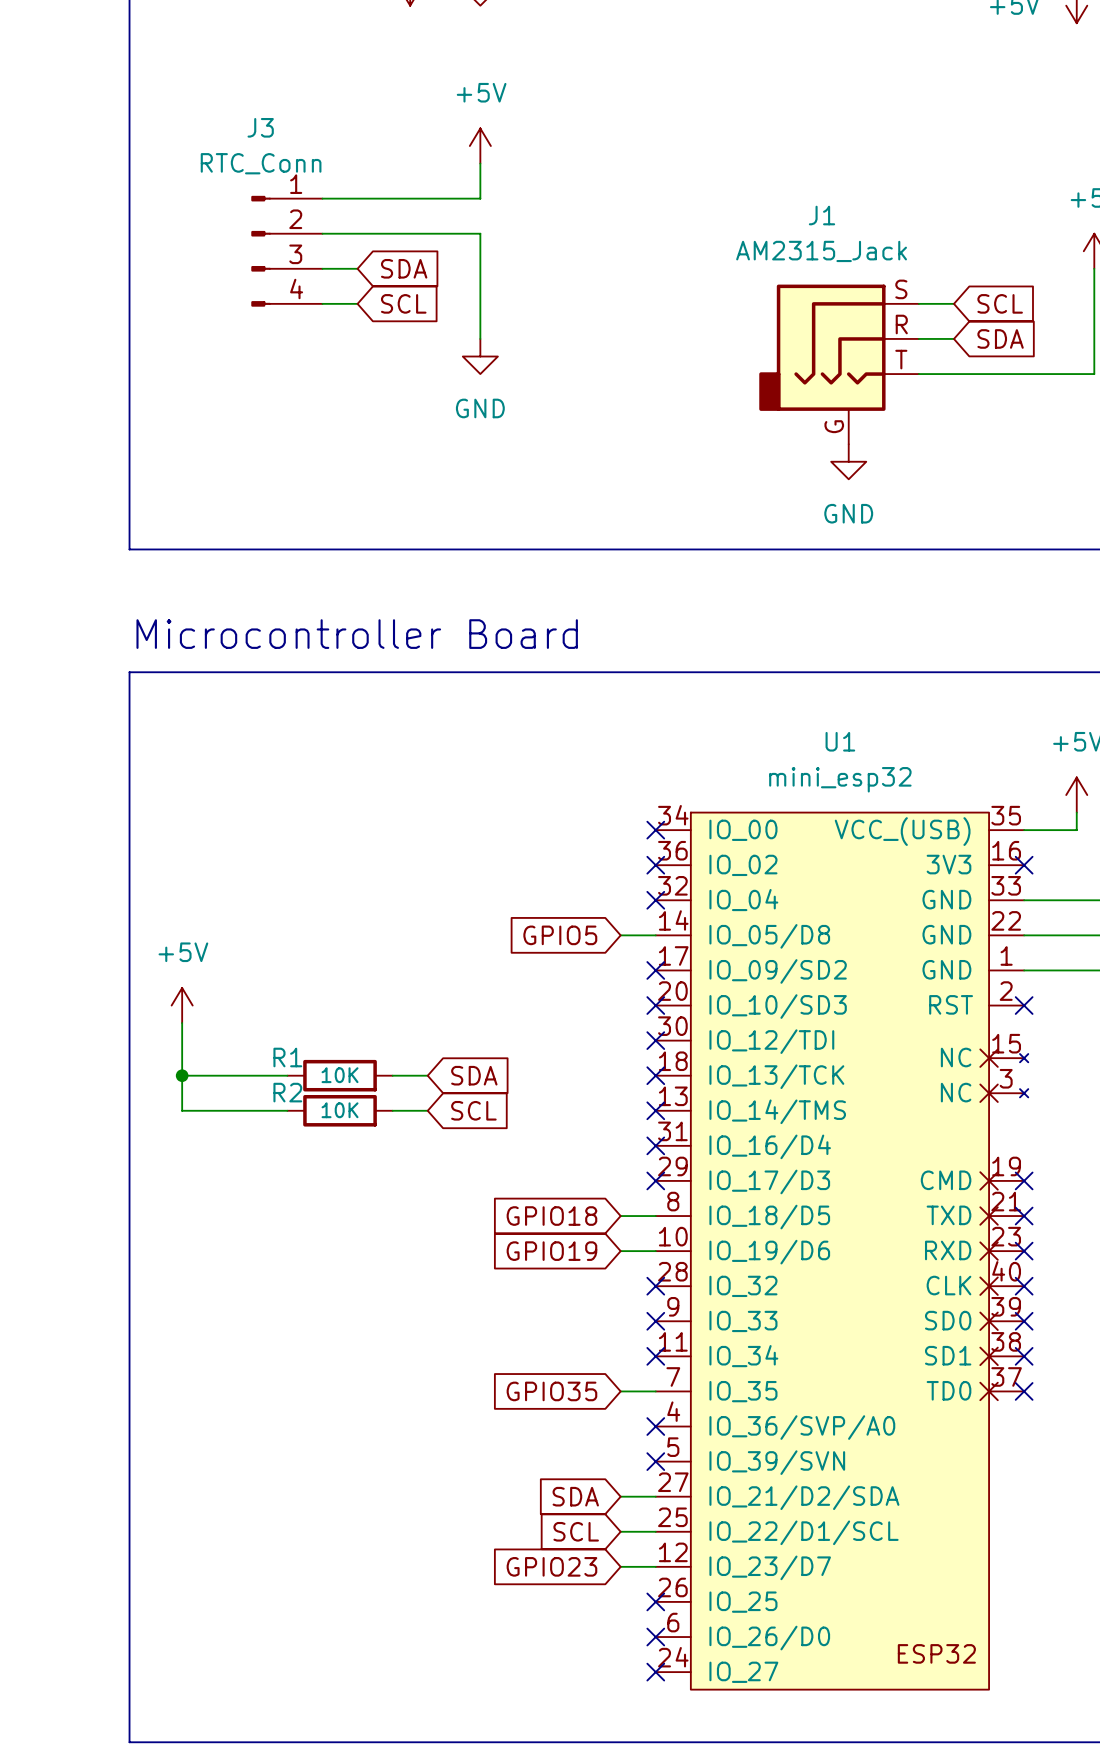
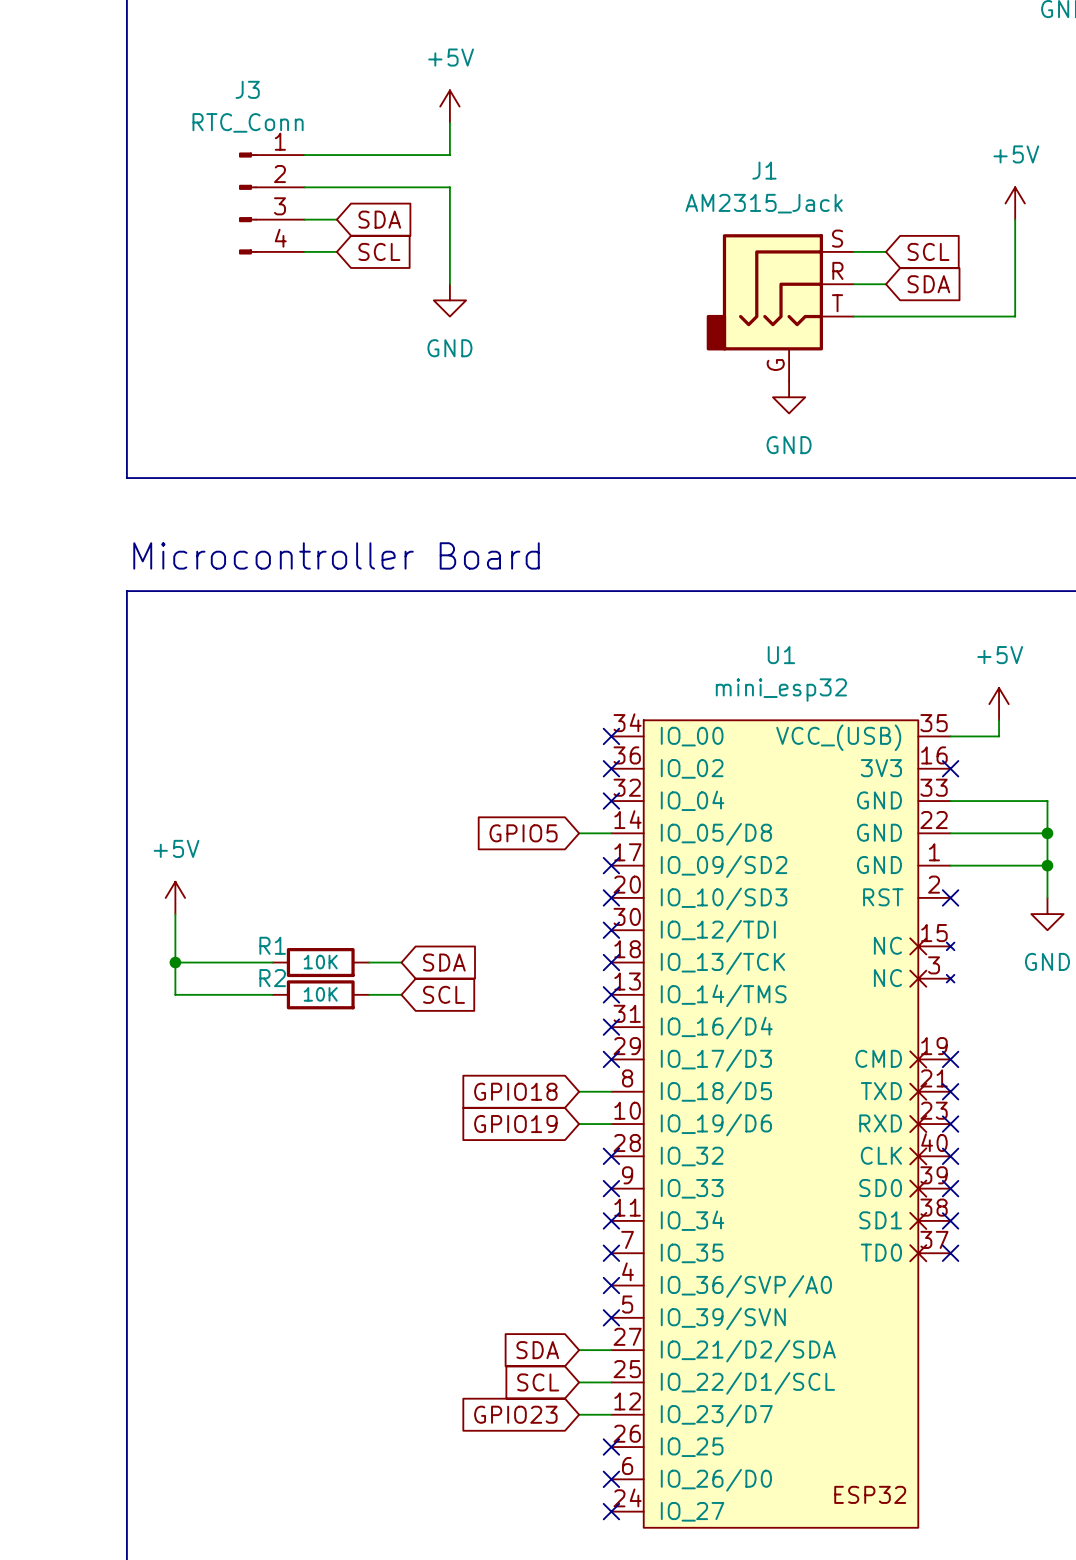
global label: GPIO35 (551, 1391) -> none
wire: (620, 1391) (655, 1391) -> none
no-connect mark: none -> (611, 1253)

